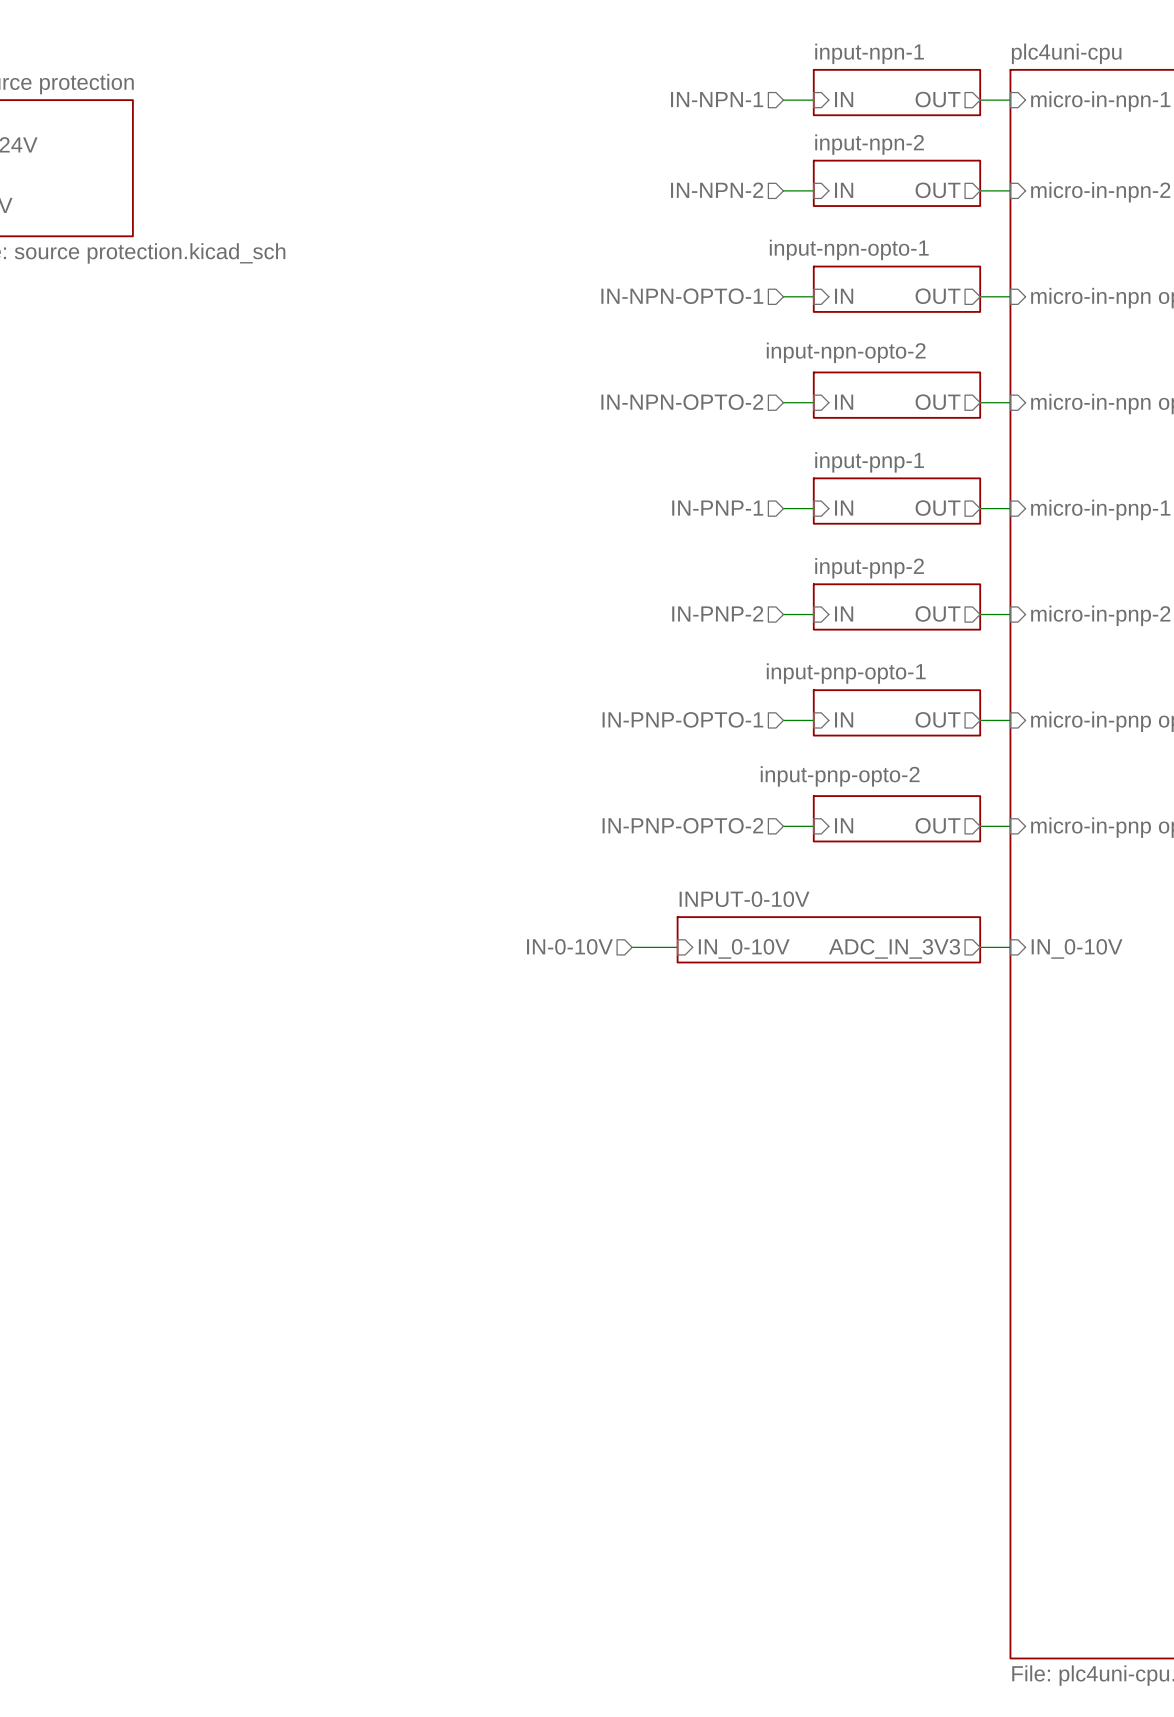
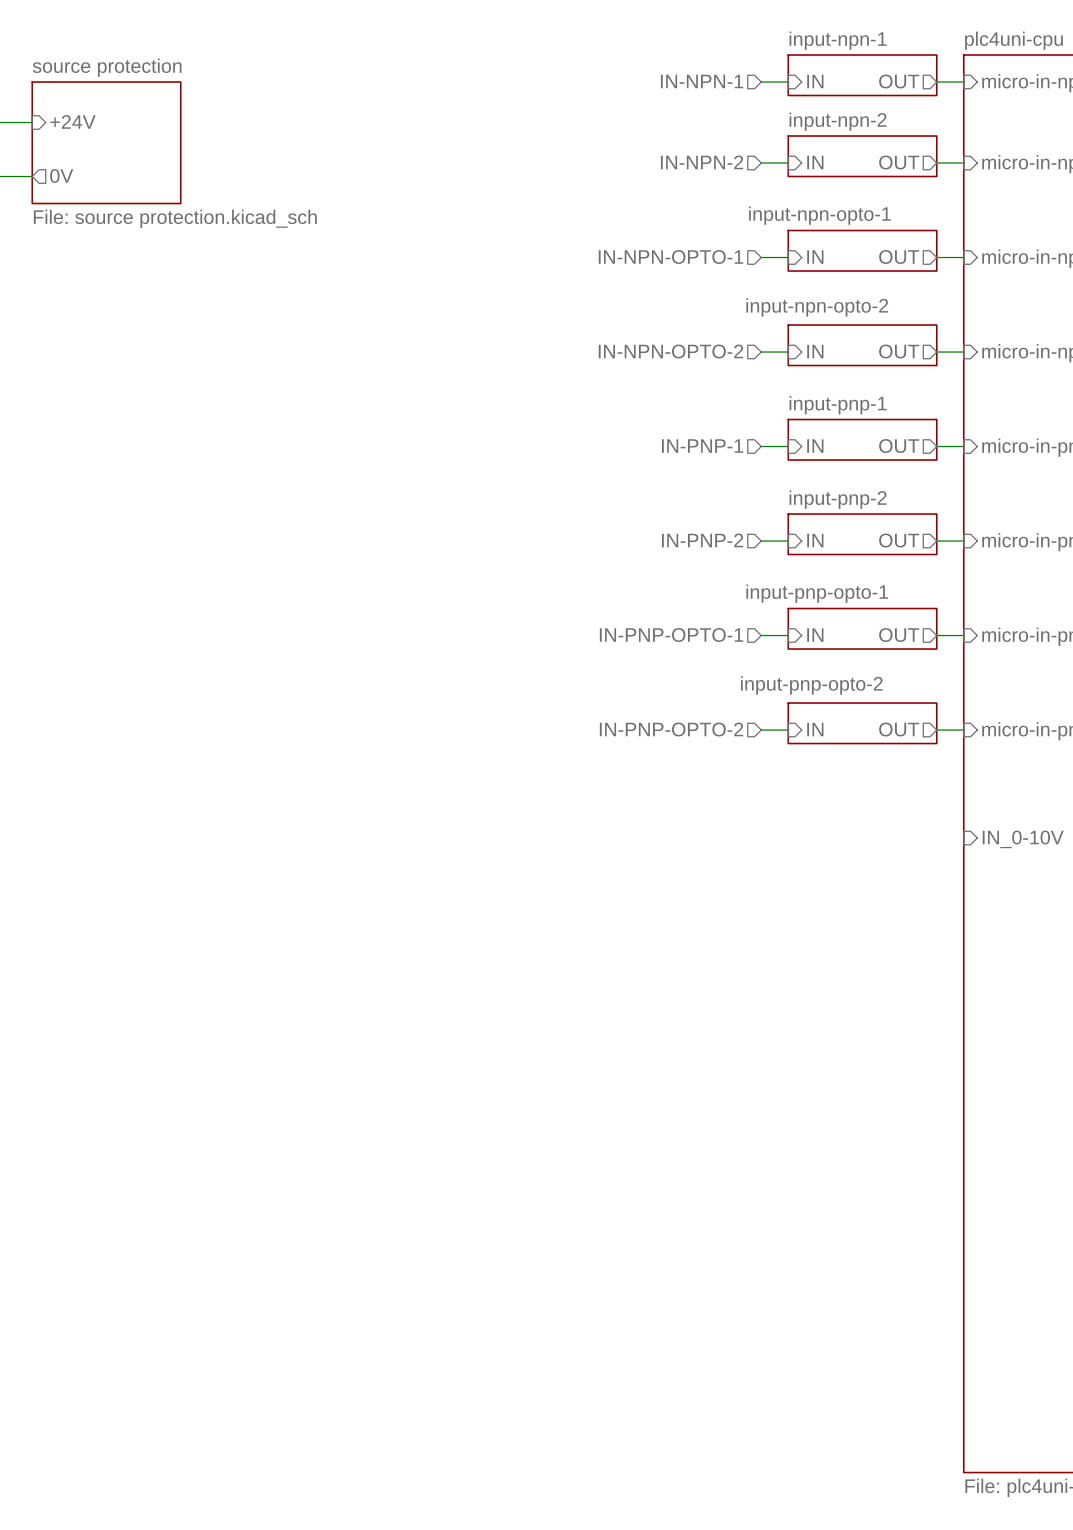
sheet INPUT-0-10V: (828, 939) -> none
hierarchical label: IN-0-10V (569, 946) -> none
wire: (632, 947) (677, 947) -> none
wire: (980, 947) (1010, 947) -> none
sheet pin: IN_0-10V (744, 948) -> none
sheet pin: ADC_IN_3V3 (894, 948) -> none

